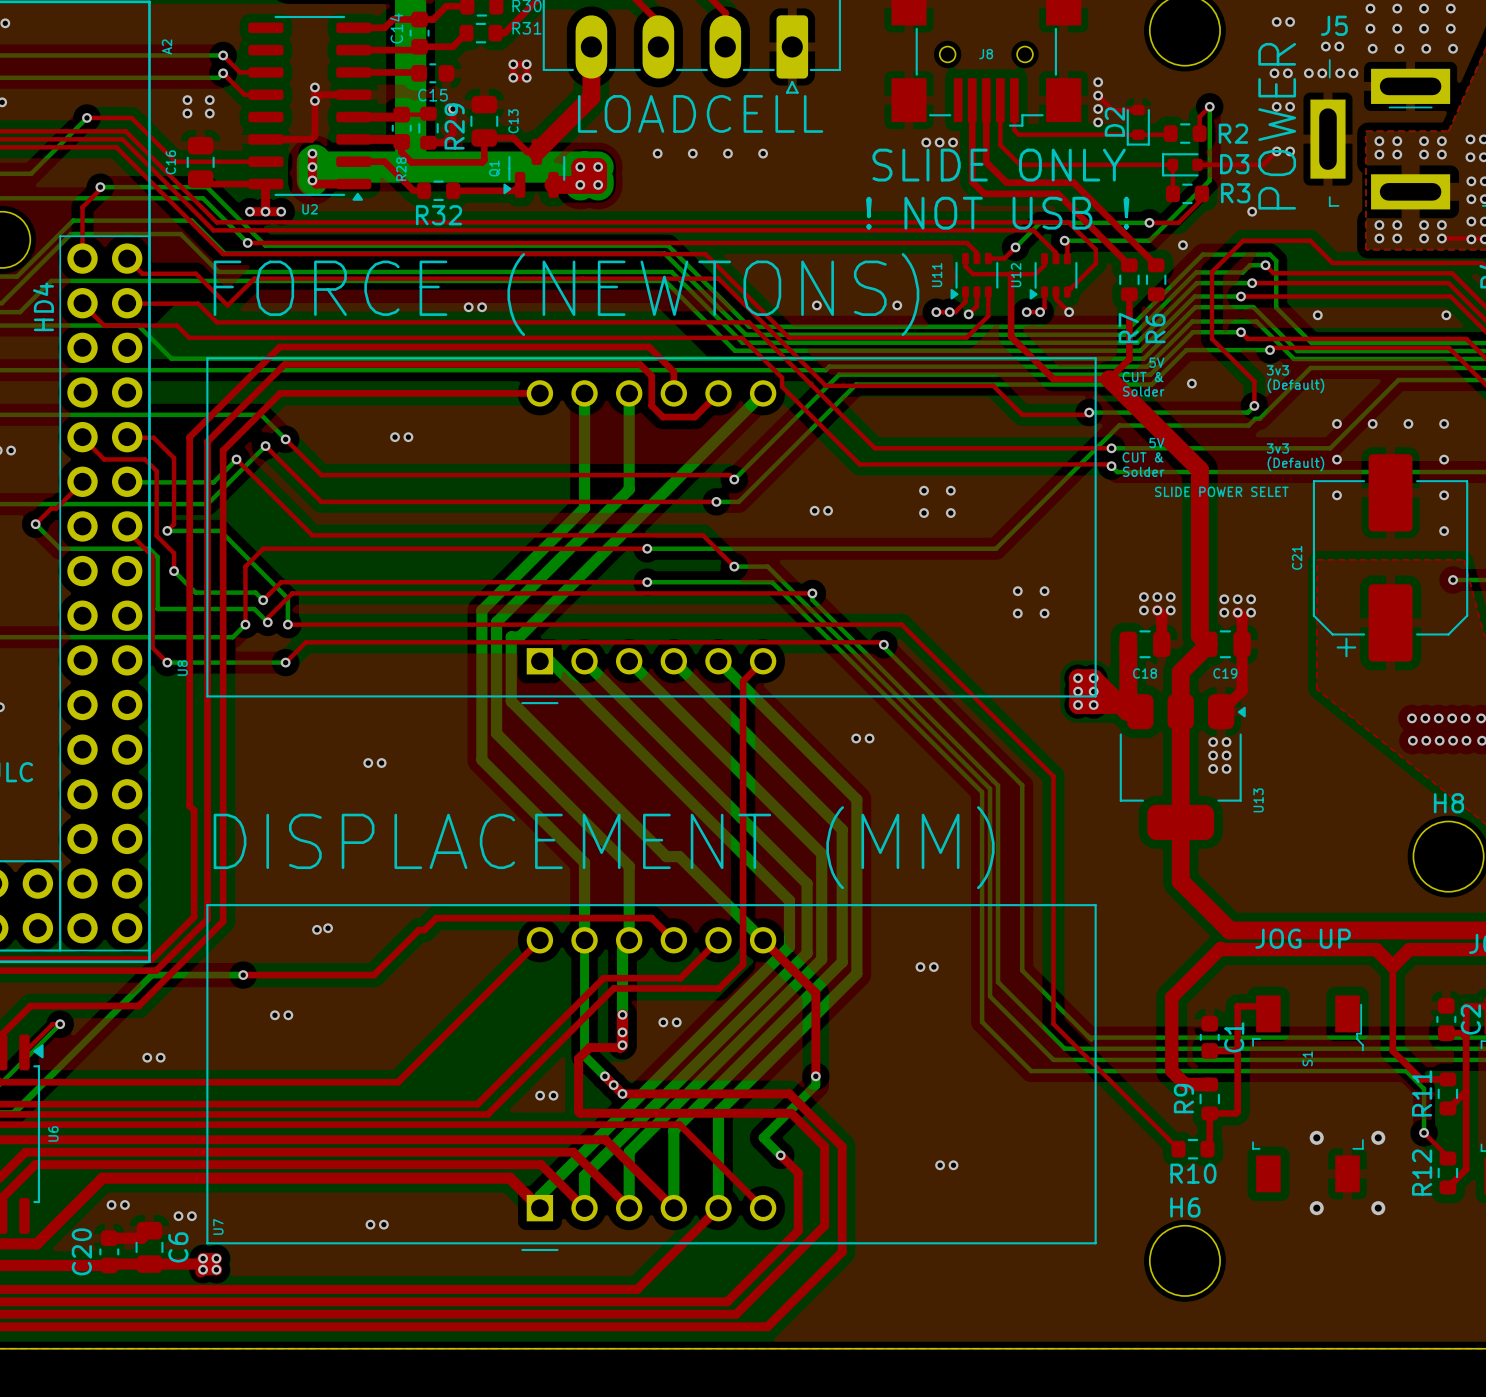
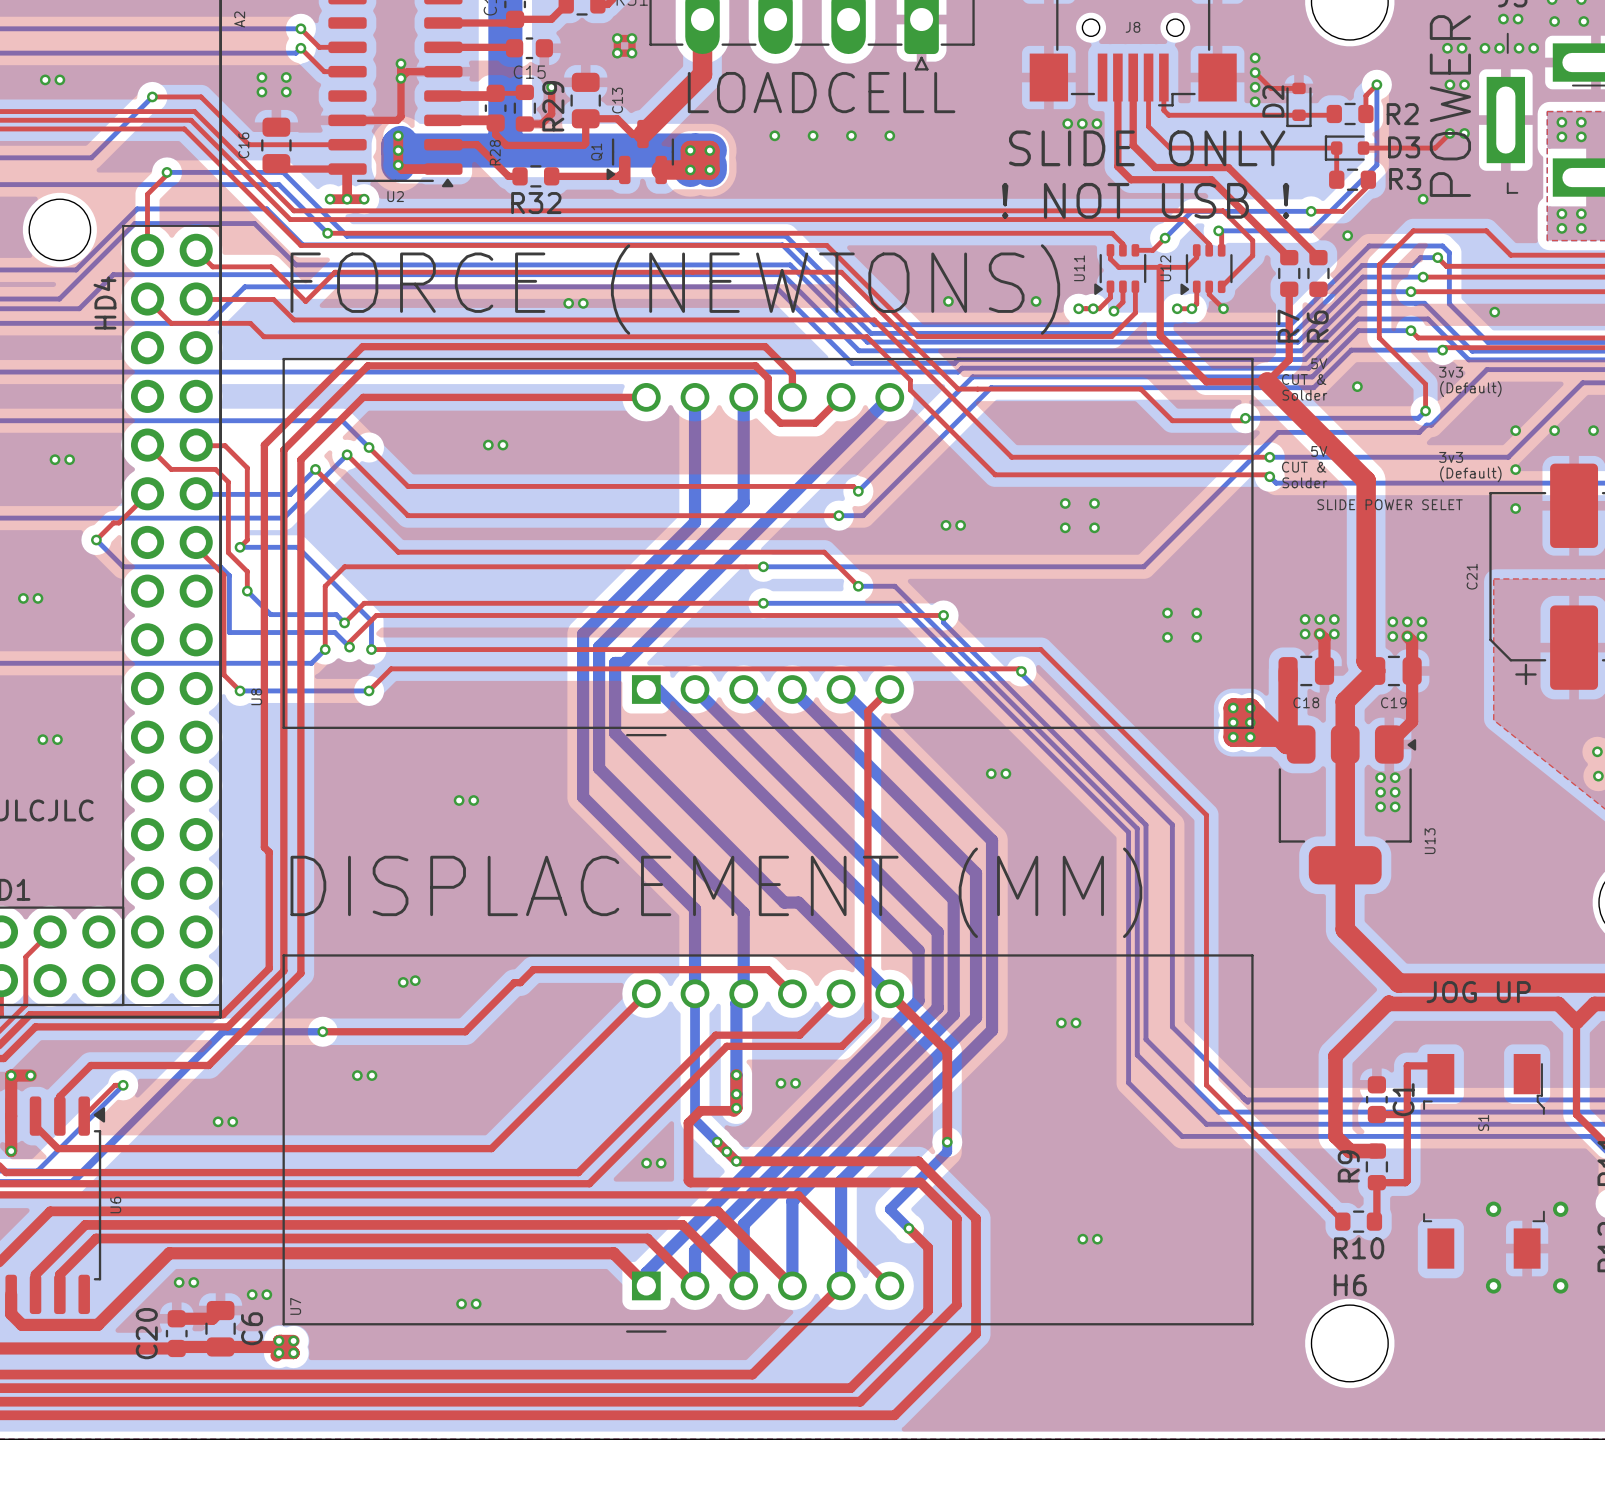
bottom track: (138, 325) (171, 358) (826, 358) -> (208, 323) (244, 286) (775, 286) (852, 363) (954, 363) (958, 359)

